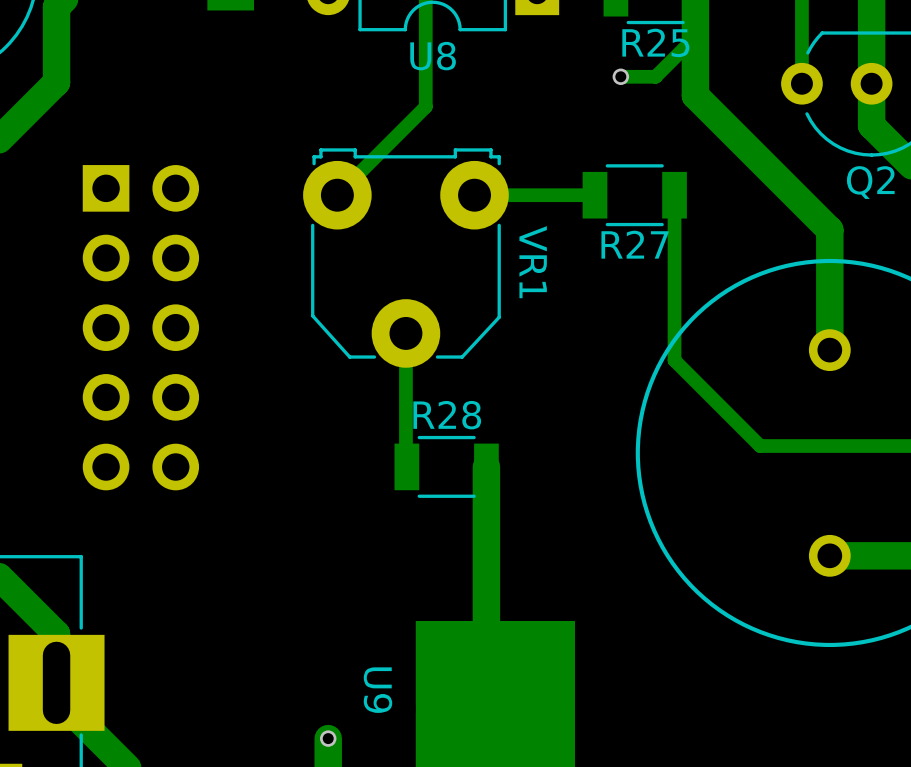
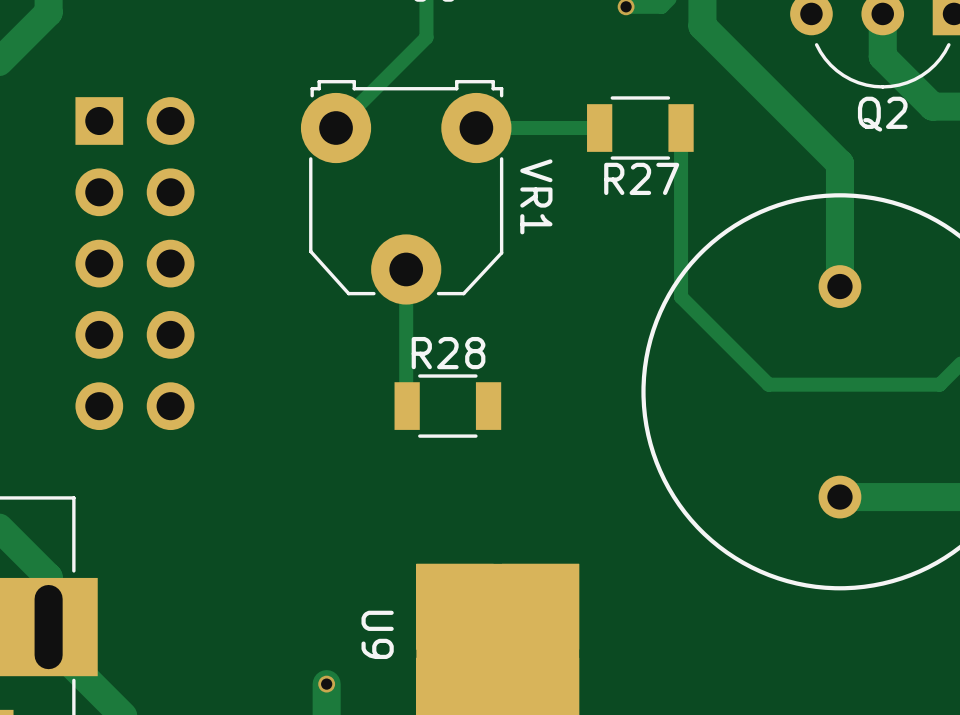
track: (486, 466) (486, 699) (495, 708) -> none

